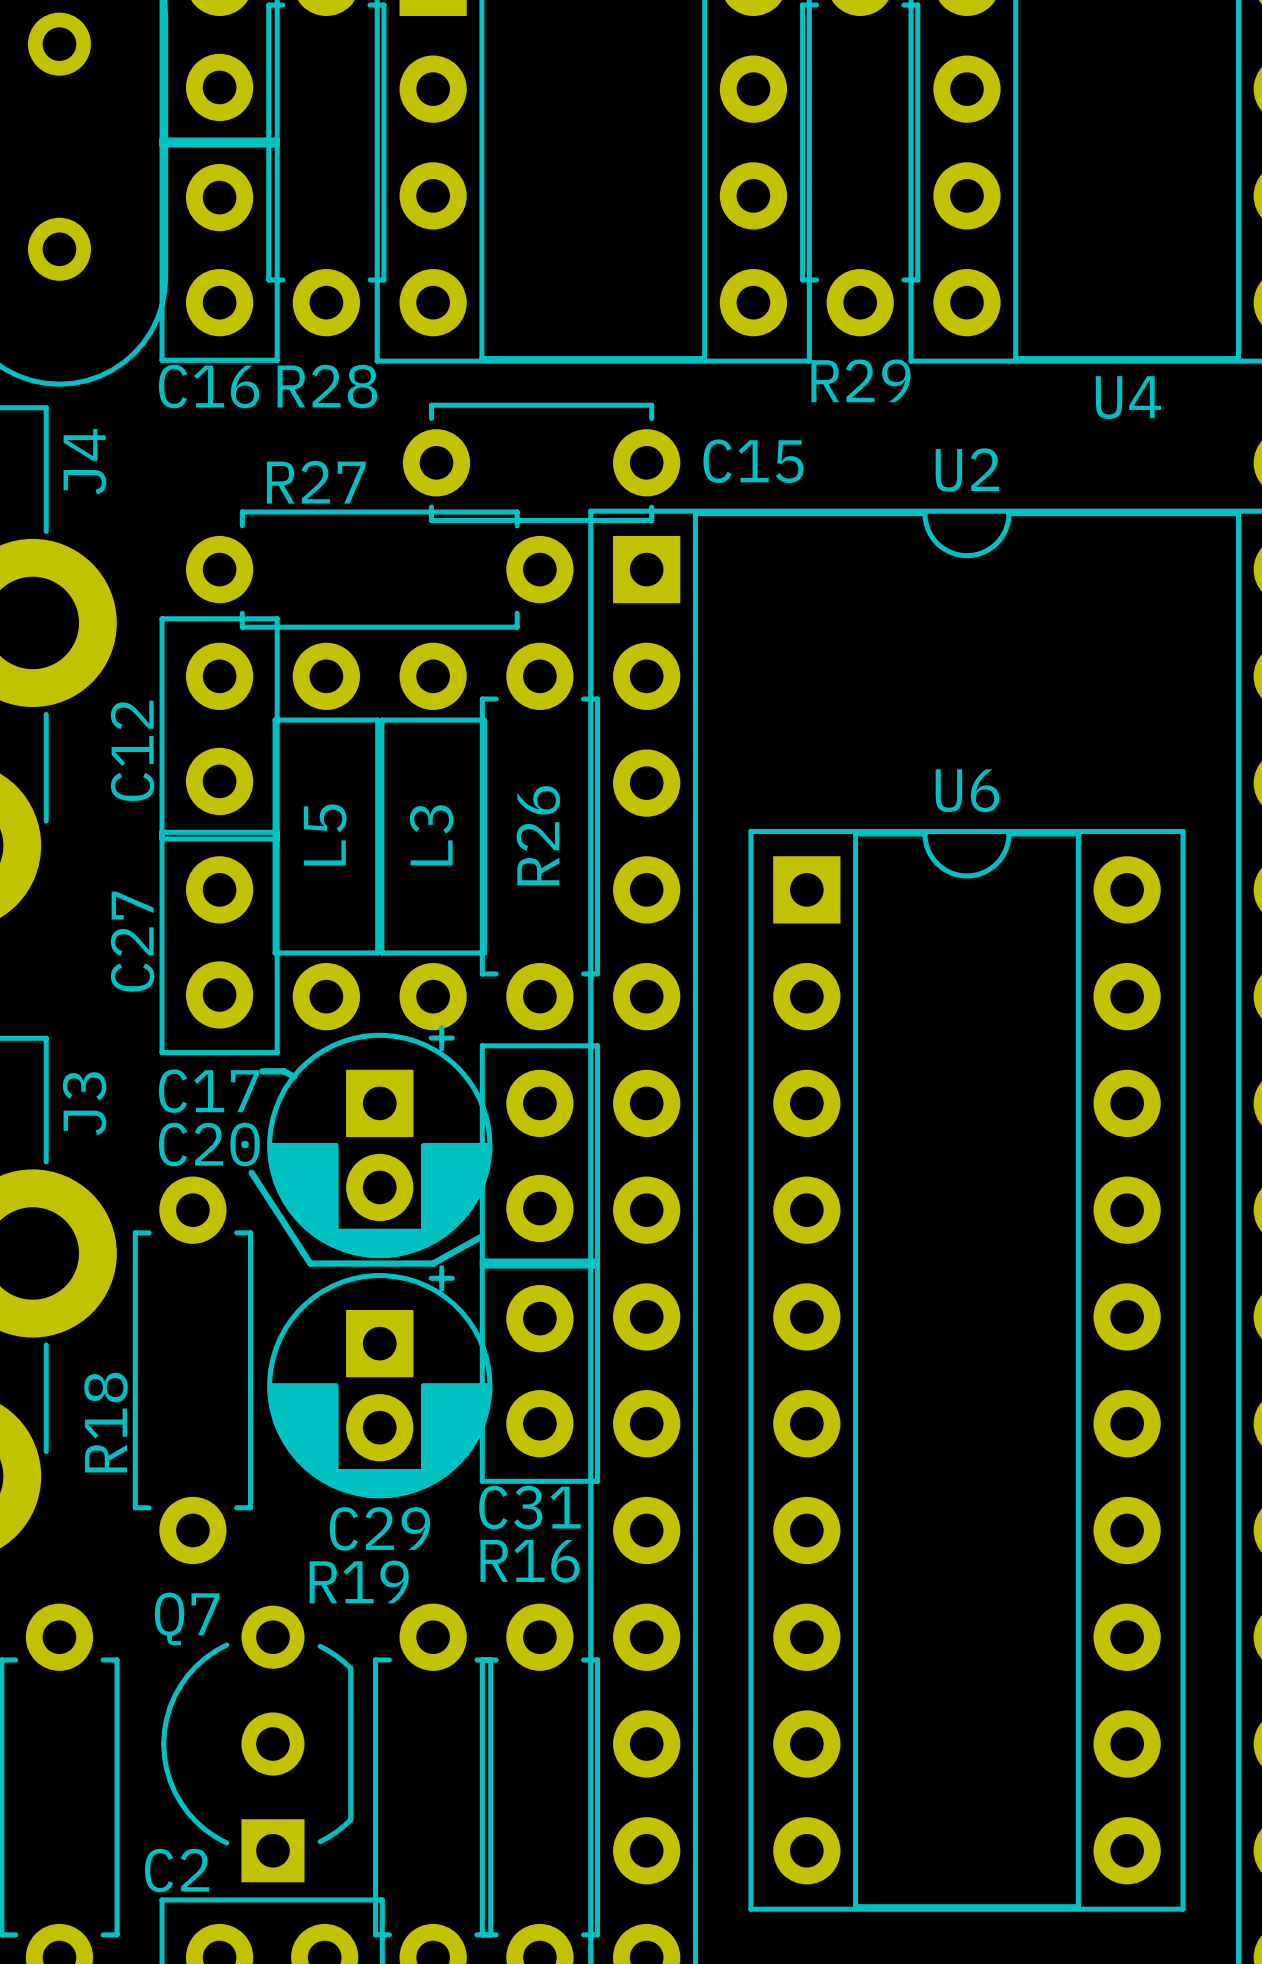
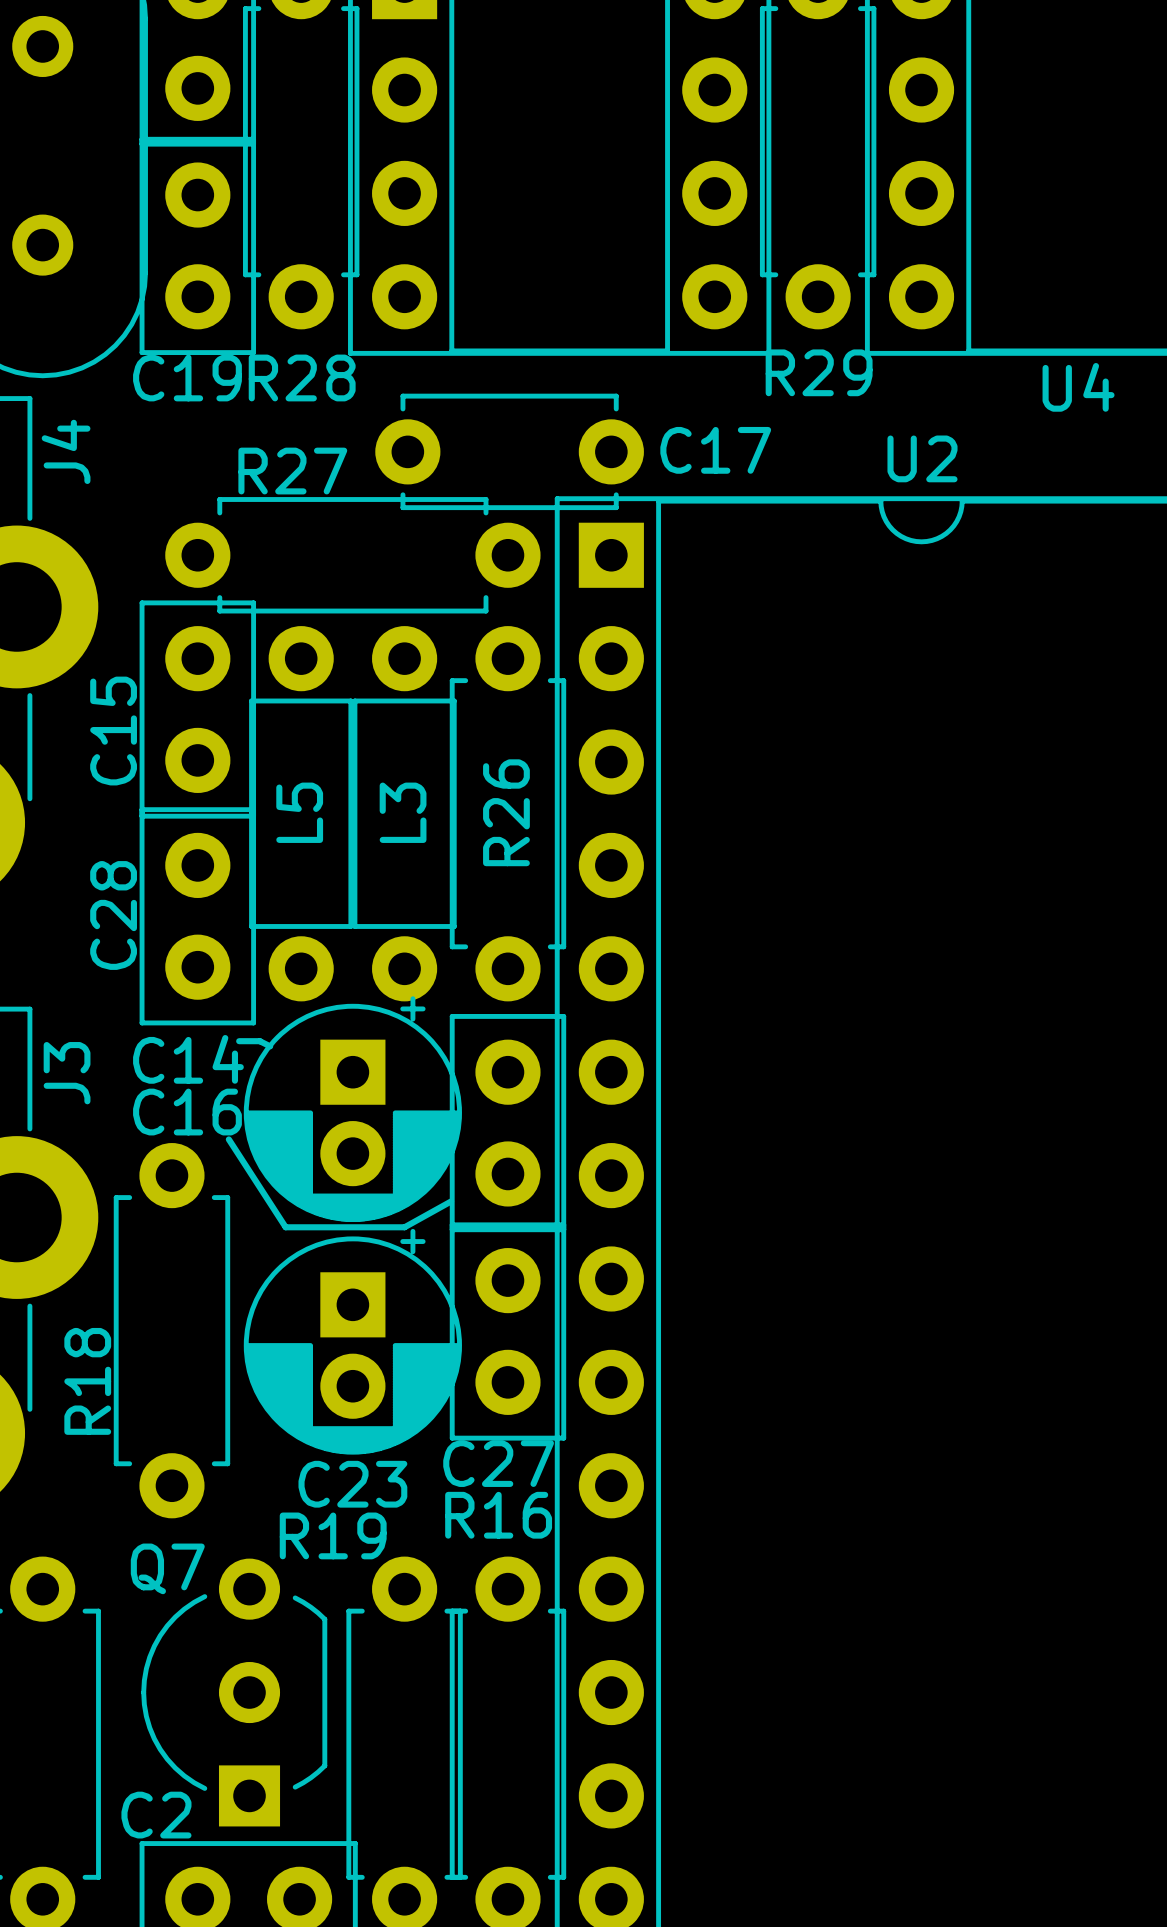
C16 name: C16 (209, 386) -> C19 (187, 377)
C15 name: C15 (753, 461) -> C17 (715, 450)
C12 name: C12 (132, 750) -> C15 (113, 731)
C27 name: C27 (132, 941) -> C28 (113, 915)
C17 name: C17 (208, 1091) -> C14 (188, 1059)
C20 name: C20 (209, 1144) -> C16 (187, 1112)
U6: (966, 1370) -> none
C31 name: C31 (529, 1507) -> C27 (498, 1463)
C29 name: C29 (379, 1528) -> C23 (352, 1484)

